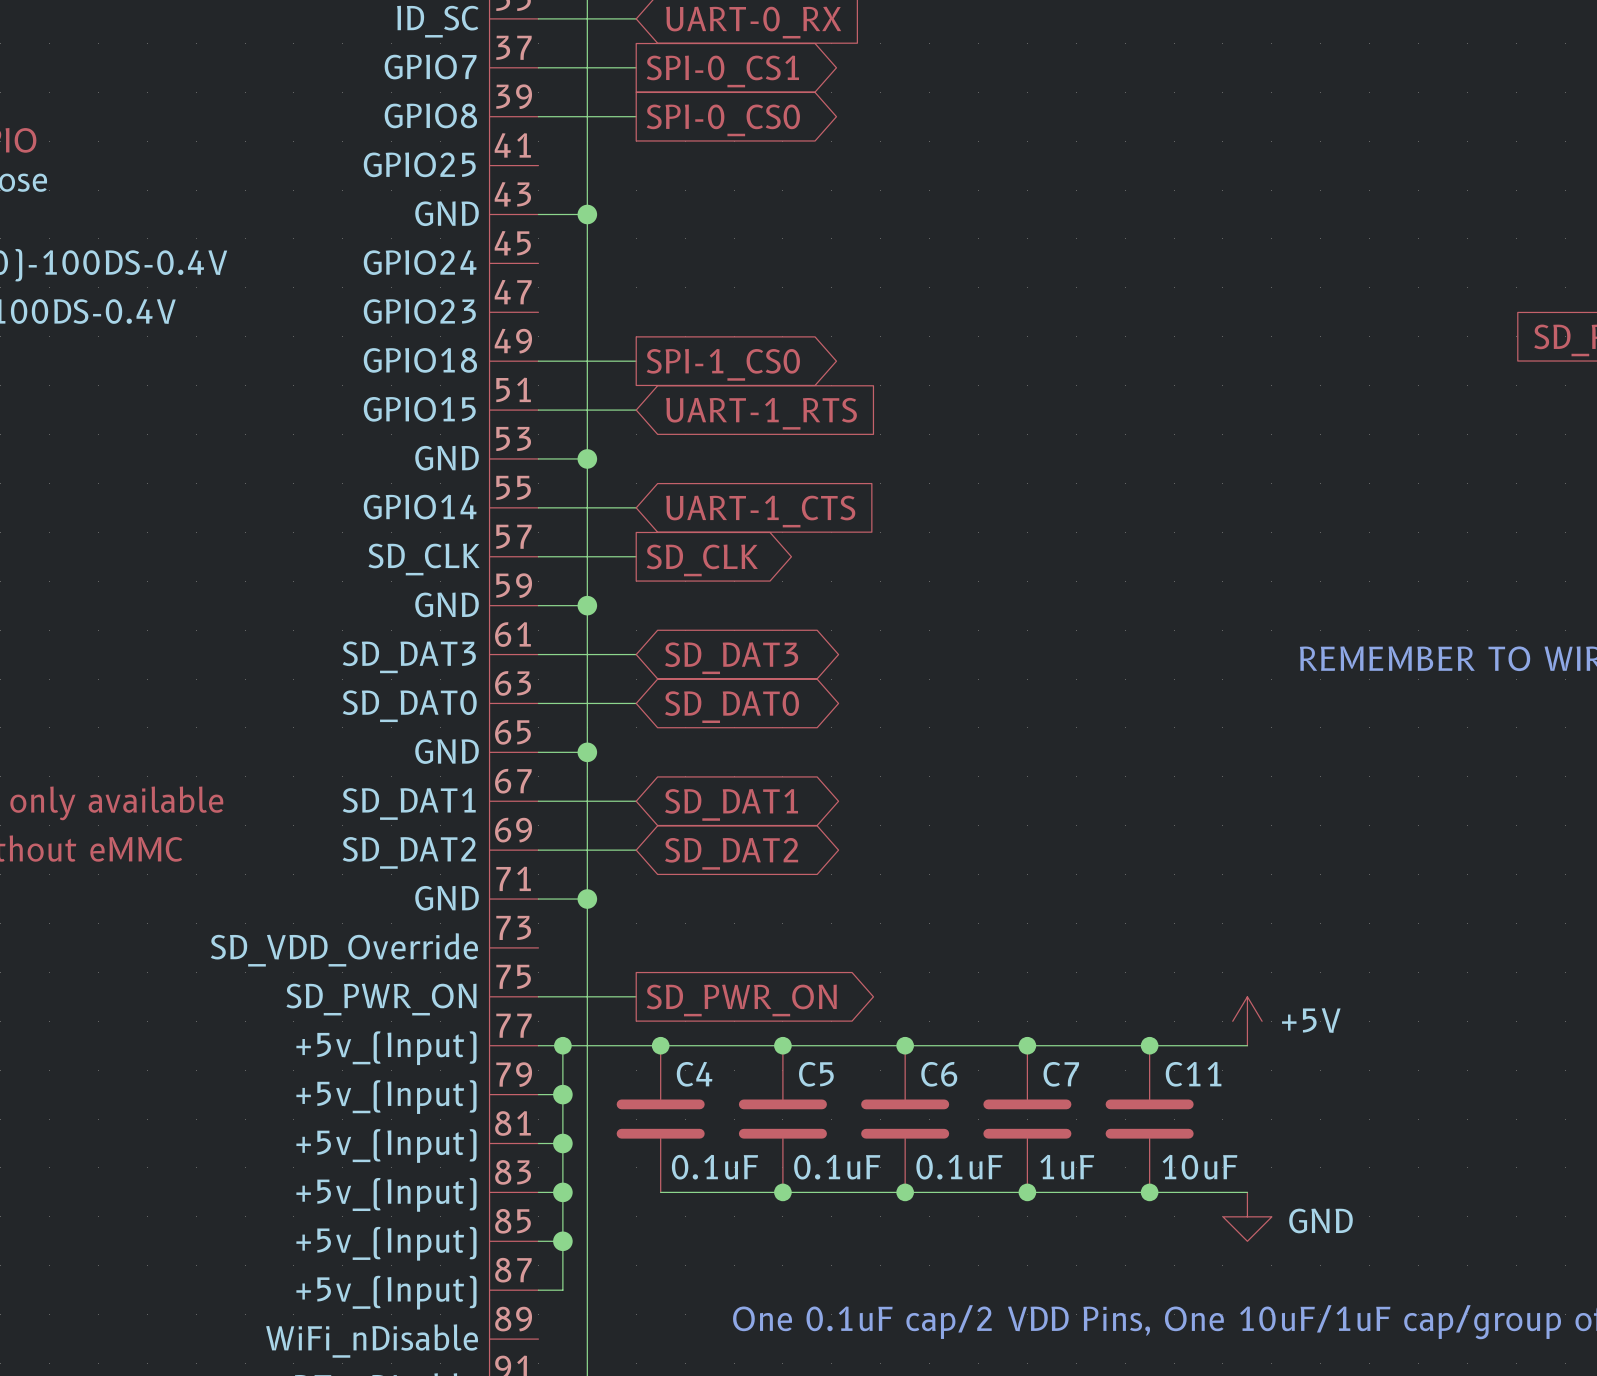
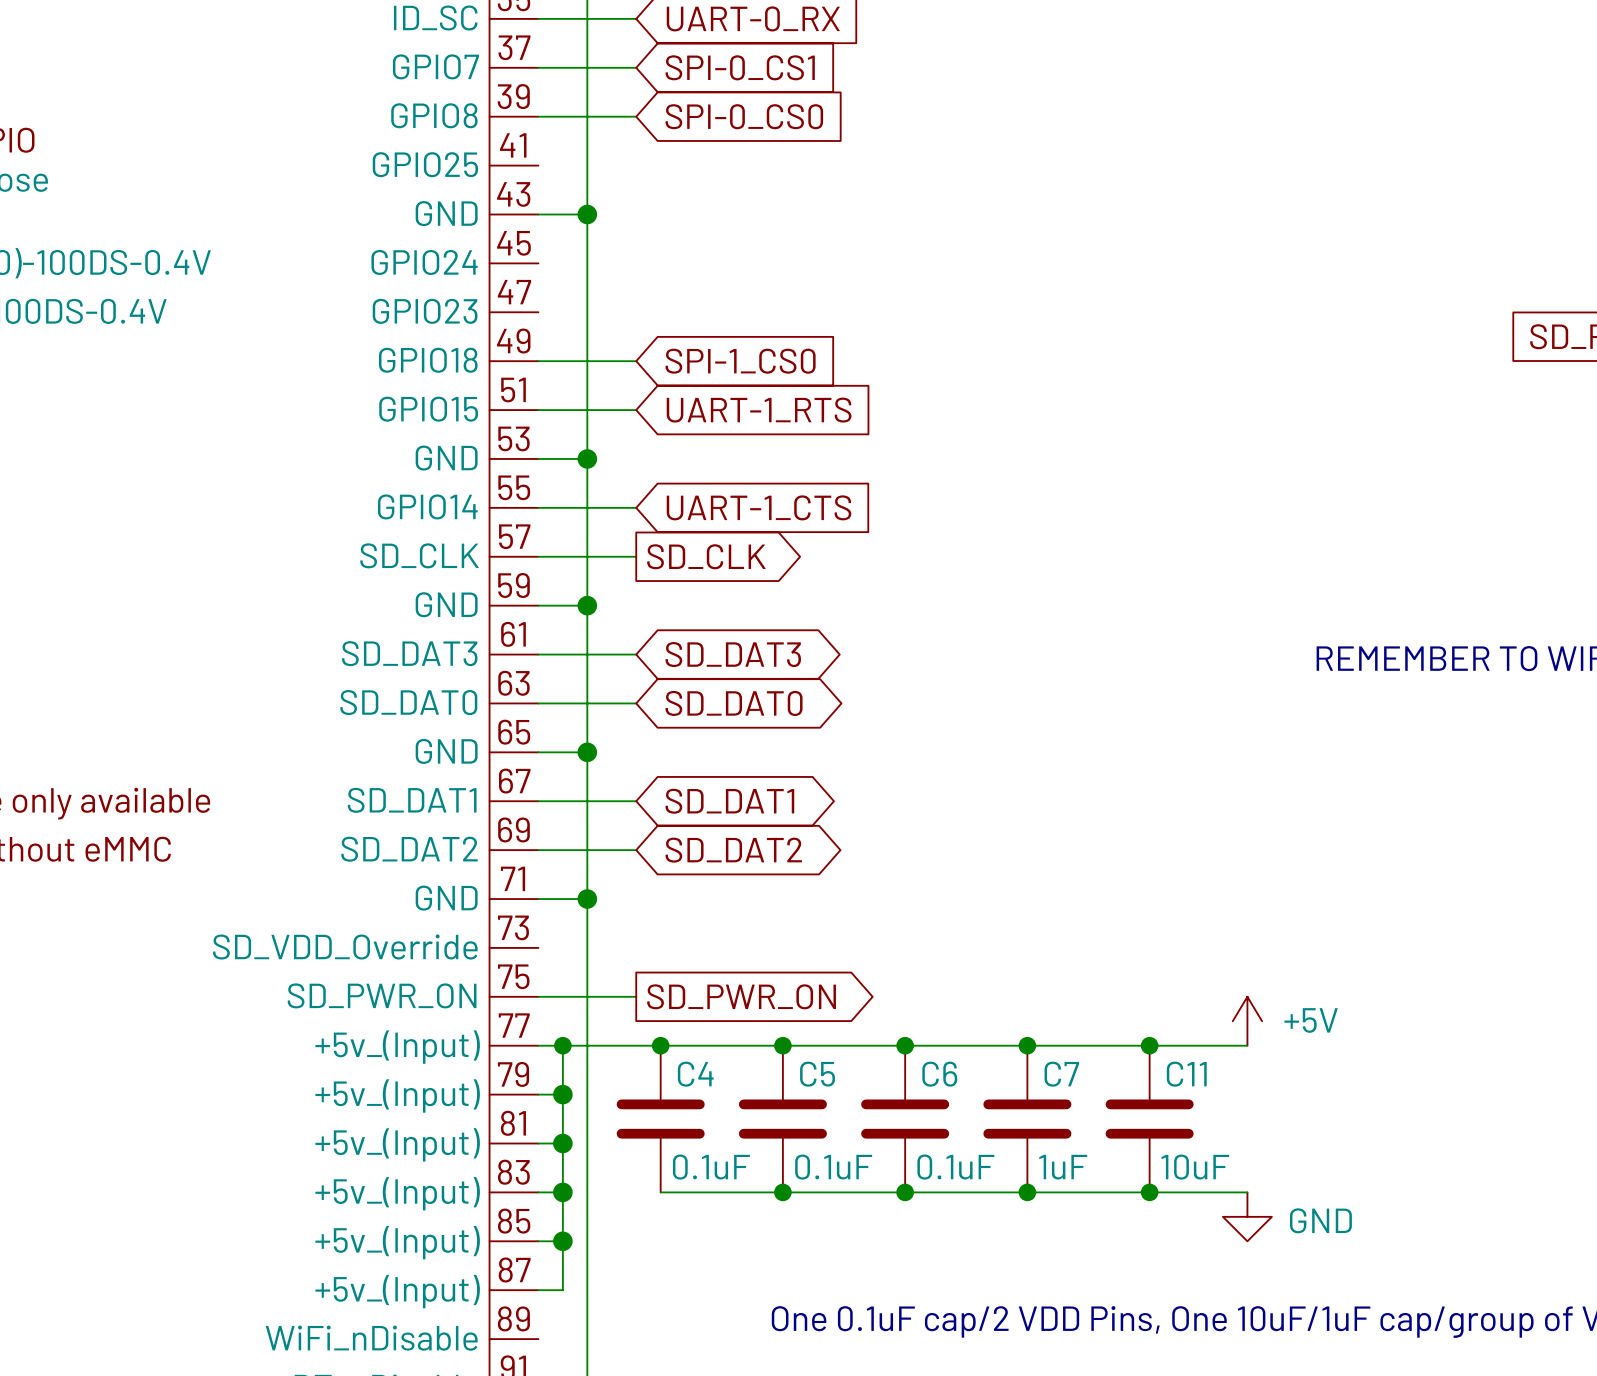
global label shape: output (722, 71) -> input (740, 67)
global label shape: output (723, 120) -> input (744, 116)
global label shape: output (723, 364) -> input (740, 361)

